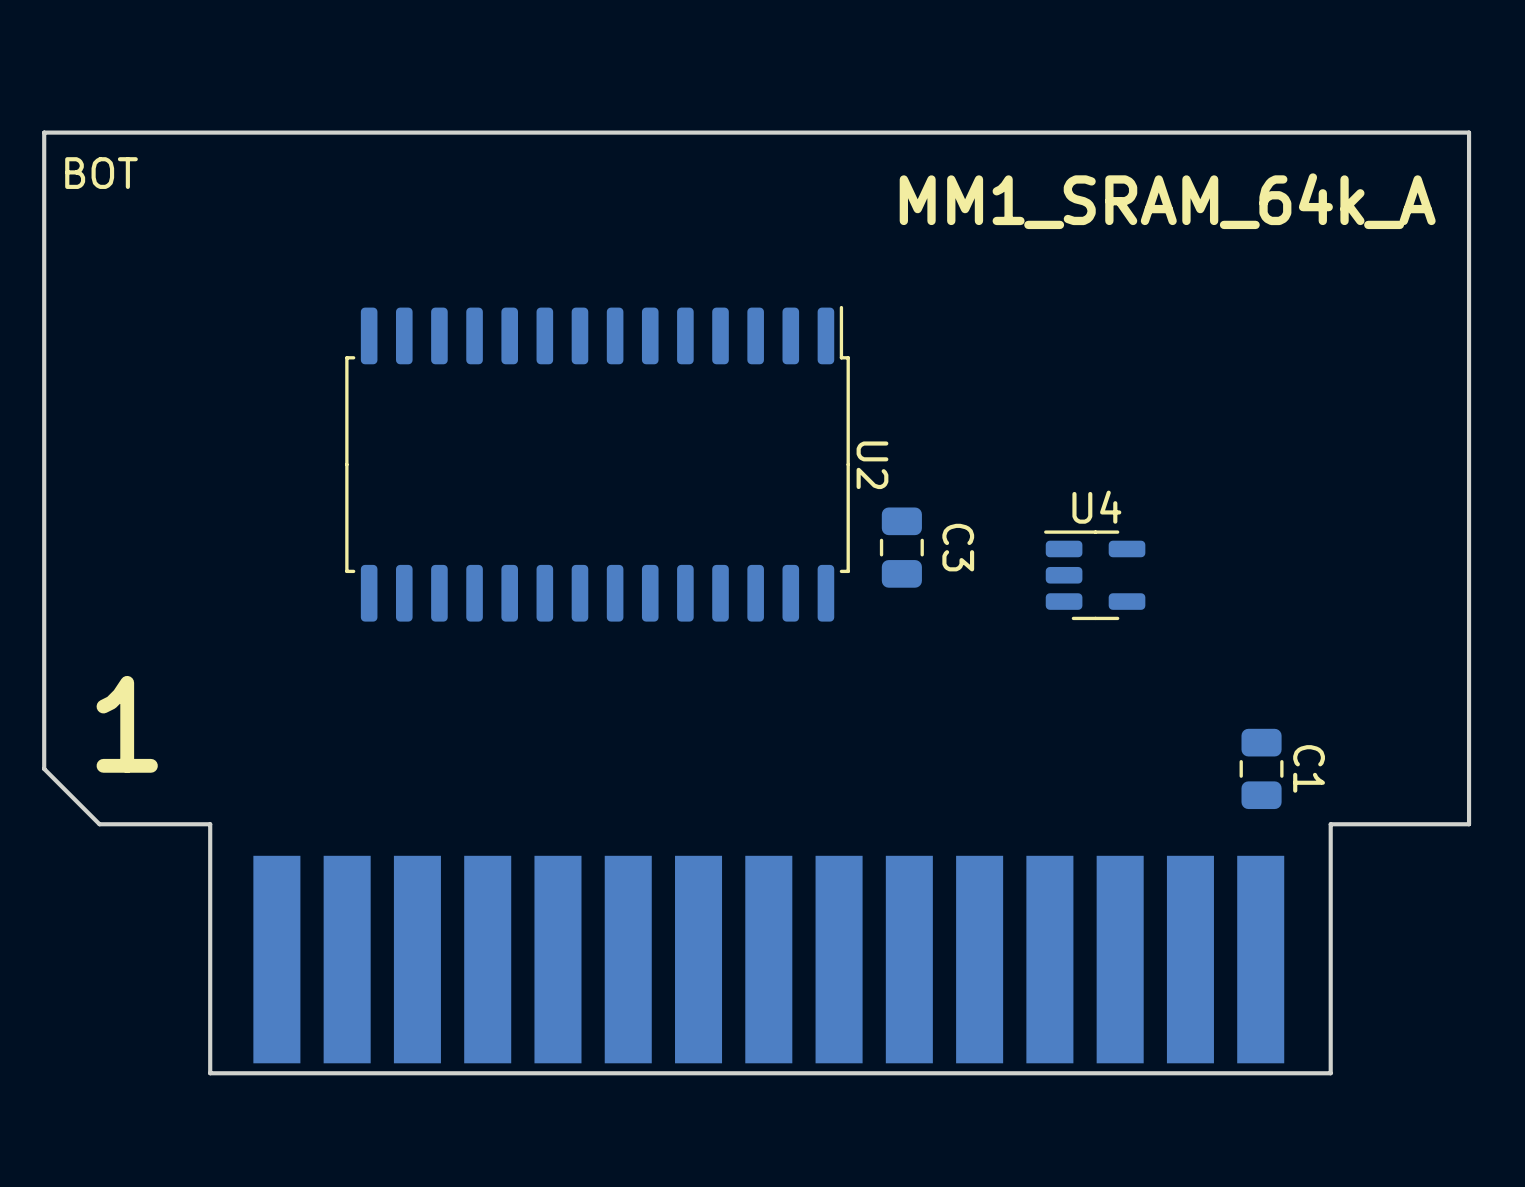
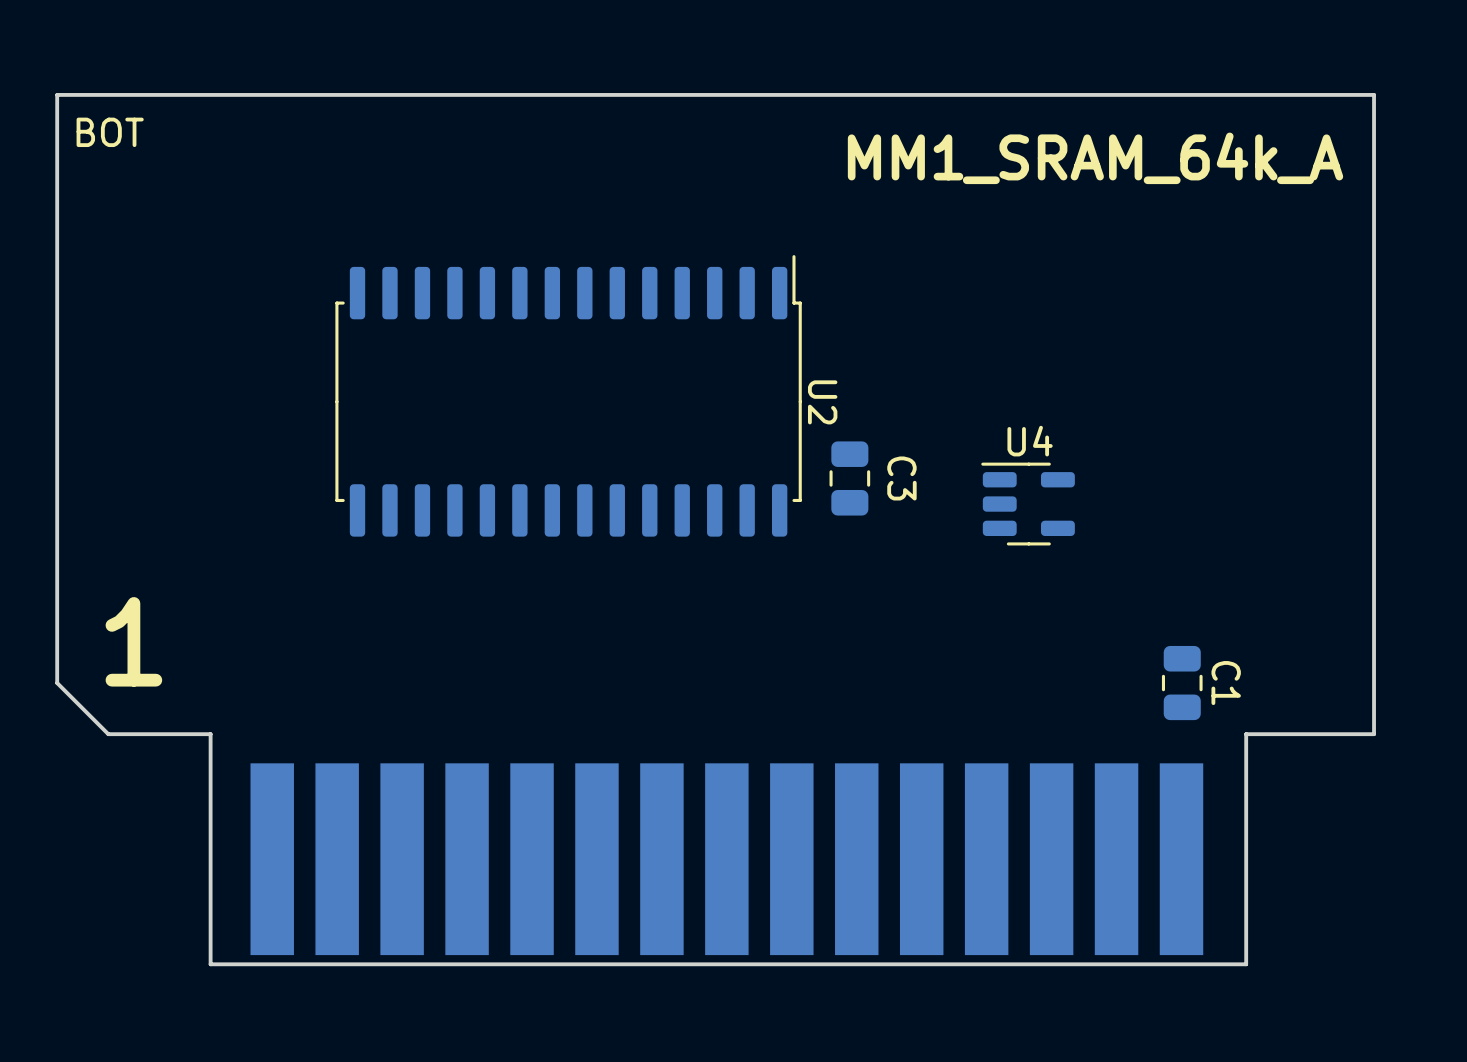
U2 footprint: [345, 305, 850, 622] -> [335, 255, 802, 537]

